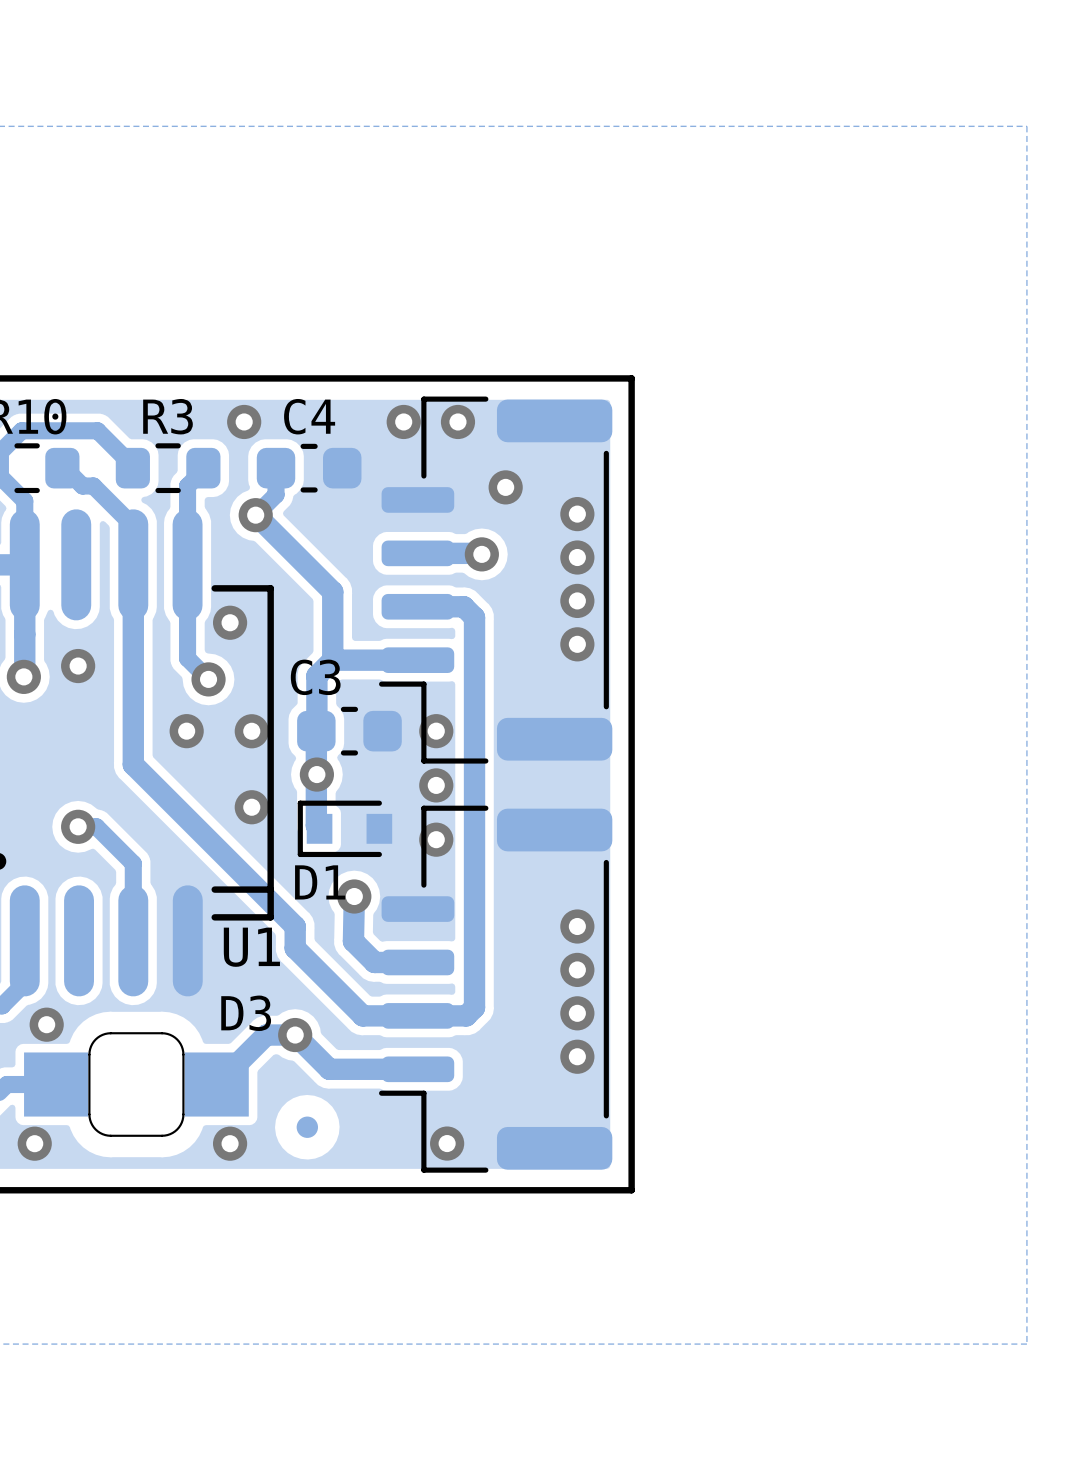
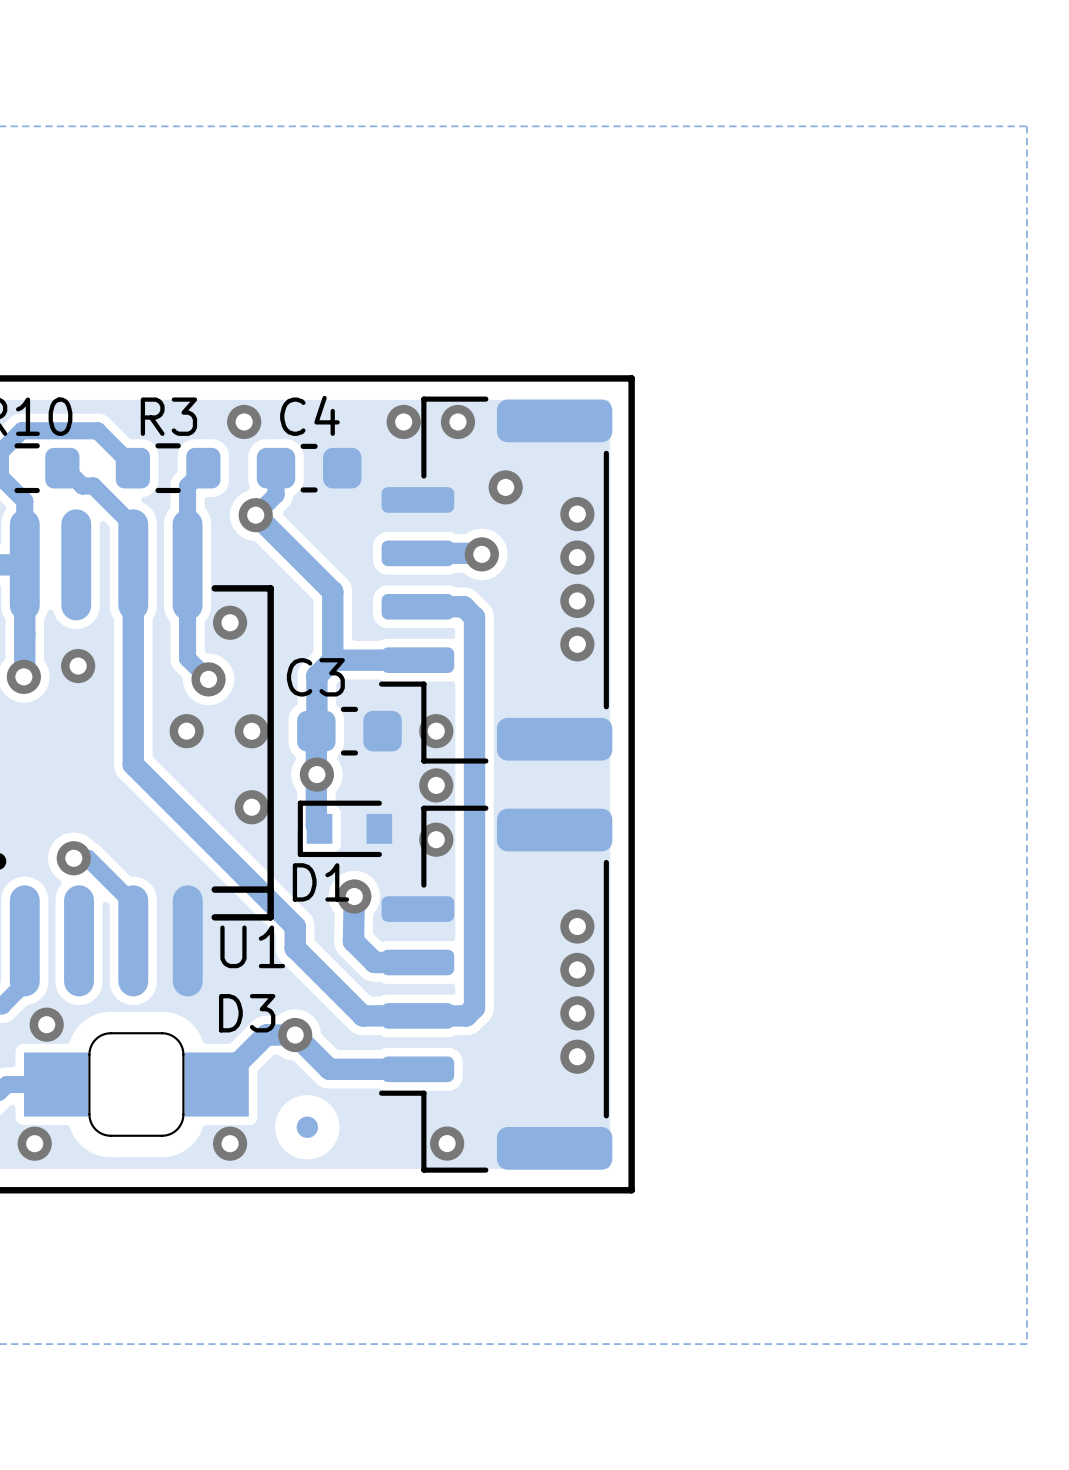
track: (78, 826) (96, 826) (133, 863) (133, 903) -> (73, 858) (87, 858) (133, 903)
via position: (78, 826) -> (73, 858)

